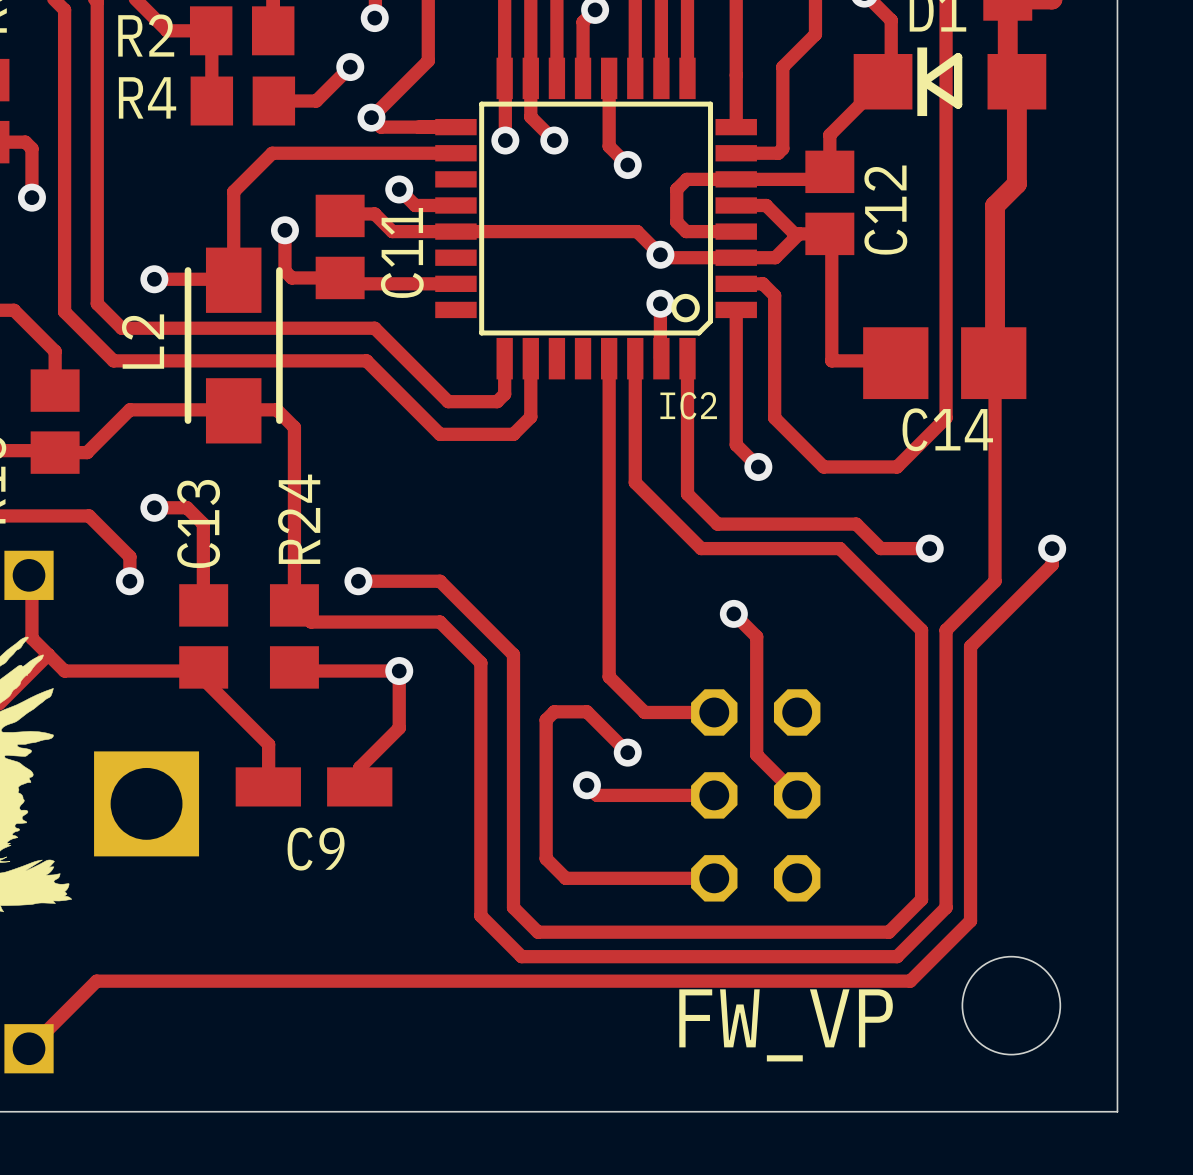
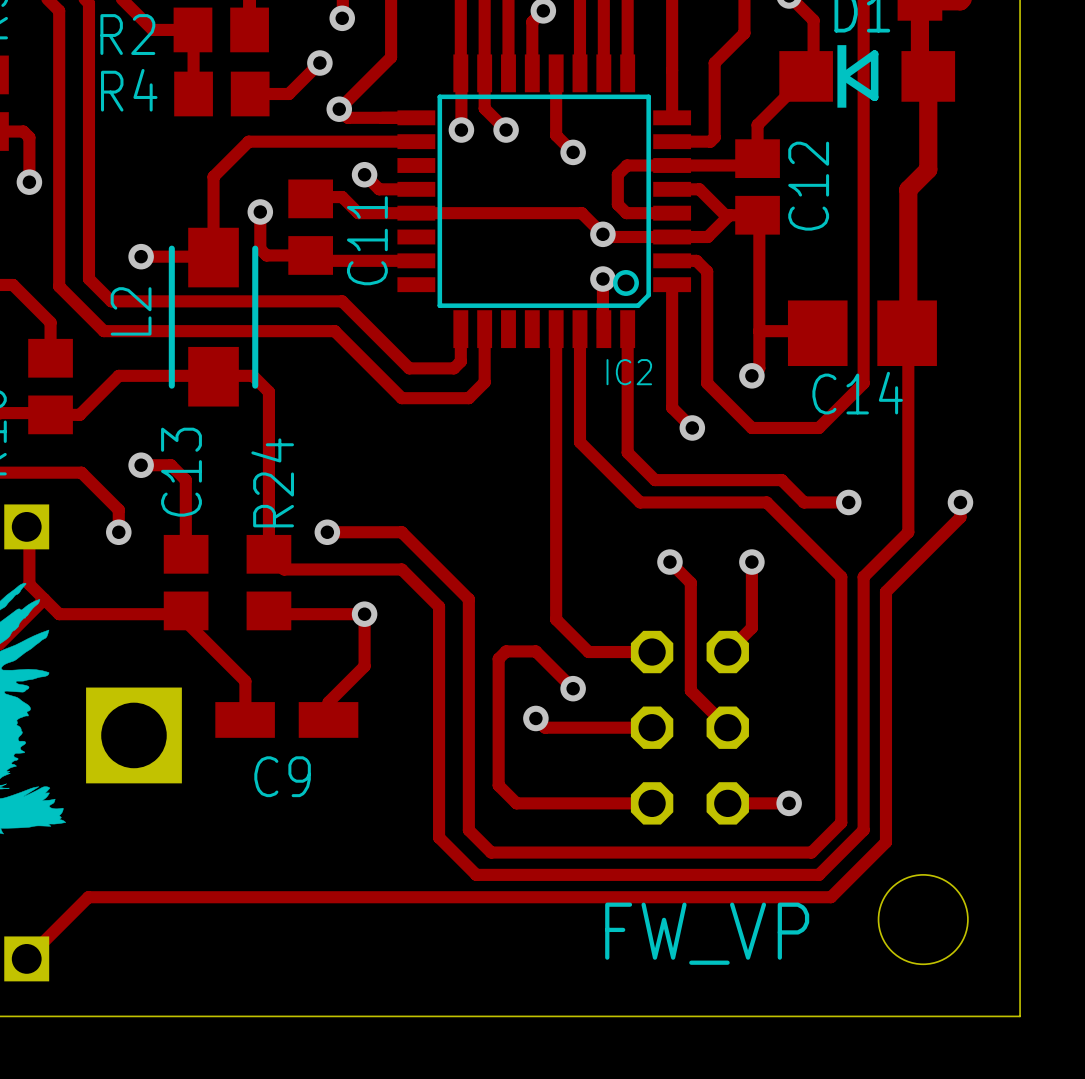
track: none -> (759, 331) (759, 368) (751, 375)
via: none -> (751, 375)
track: none -> (751, 562) (751, 627) (727, 652)
via: none -> (751, 562)
track: none -> (727, 803) (789, 803)
via: none -> (789, 803)

